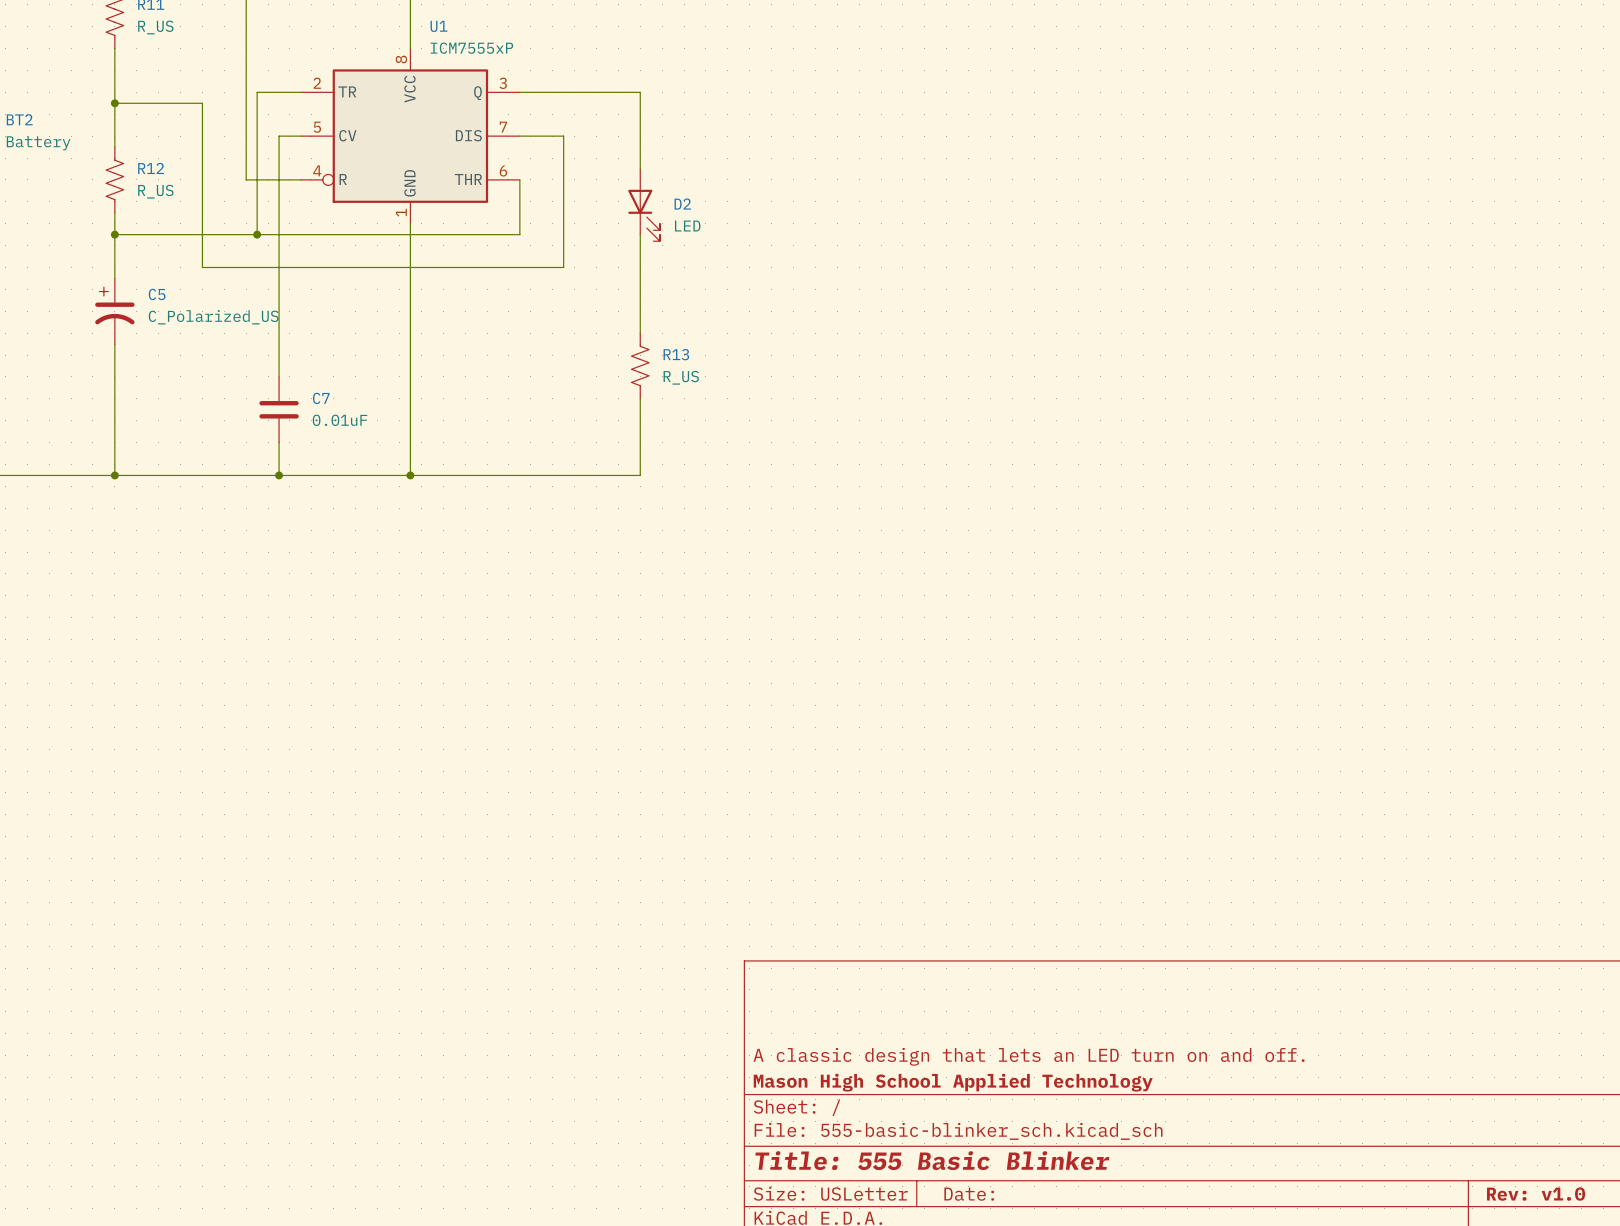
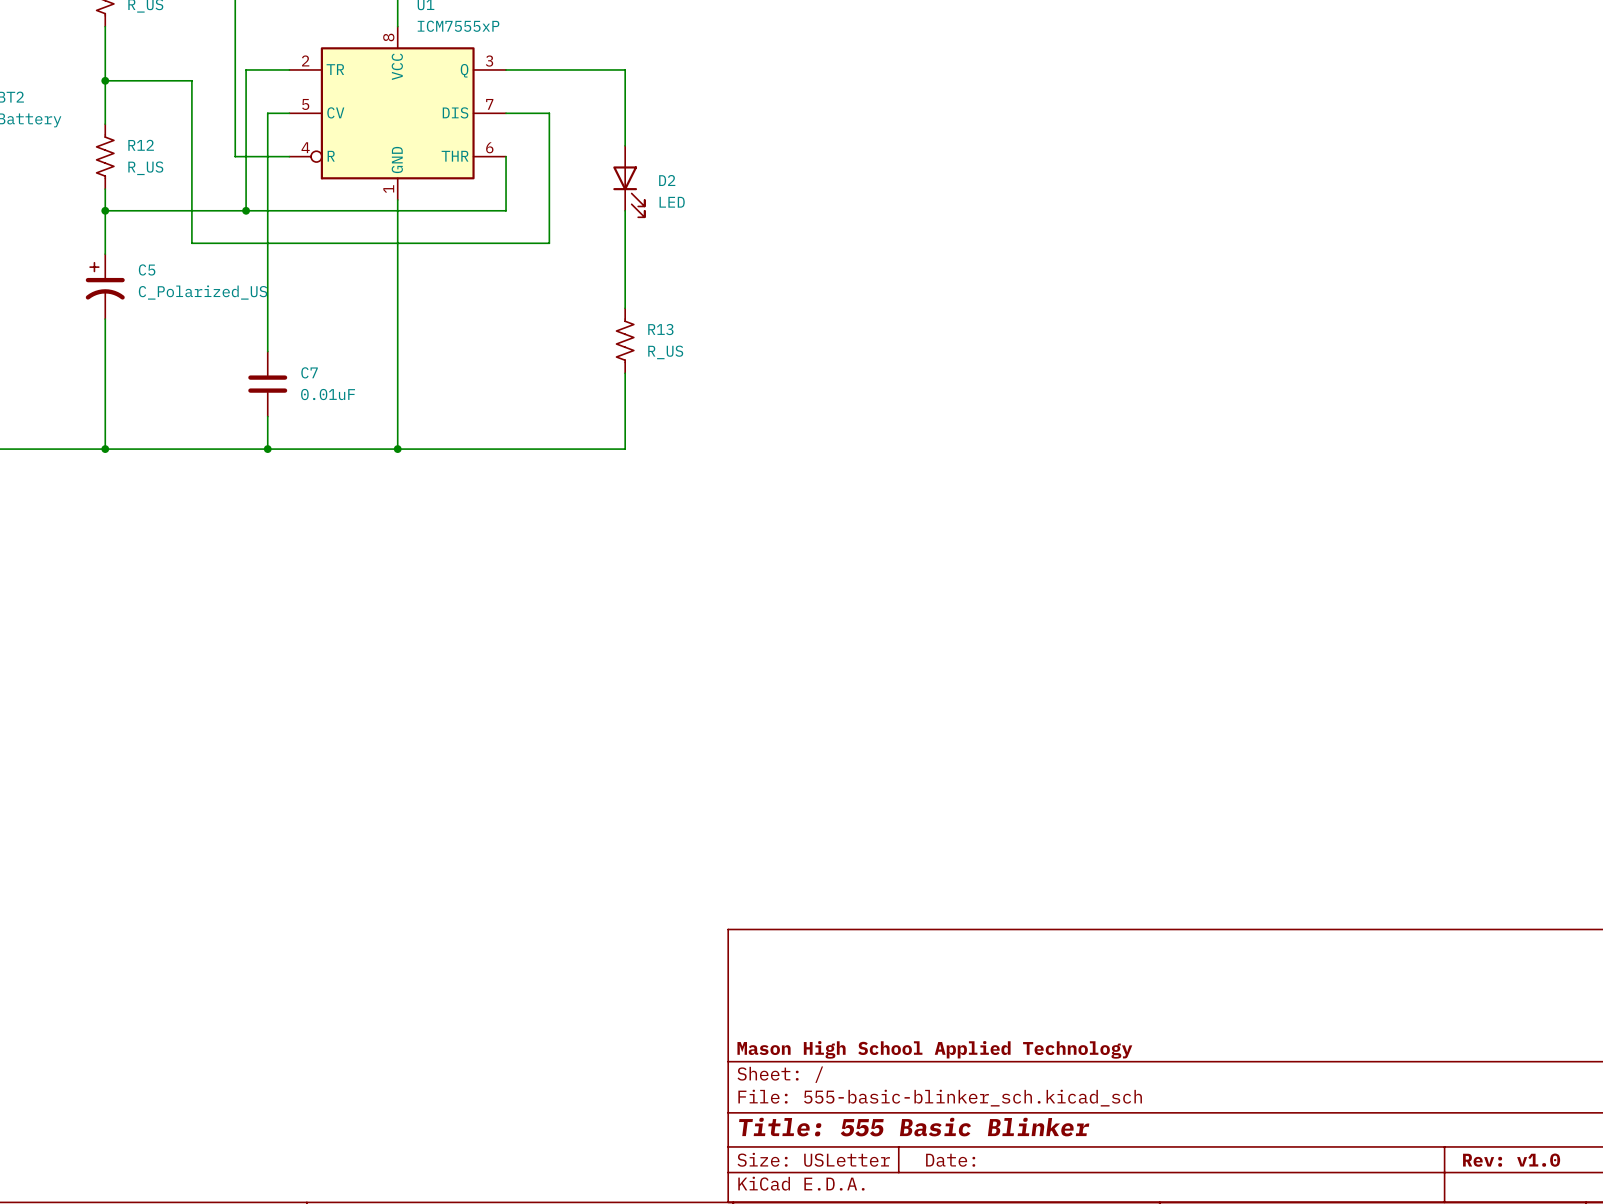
title block: A classic design that lets an LED turn on and off. (1029, 1056) -> none

